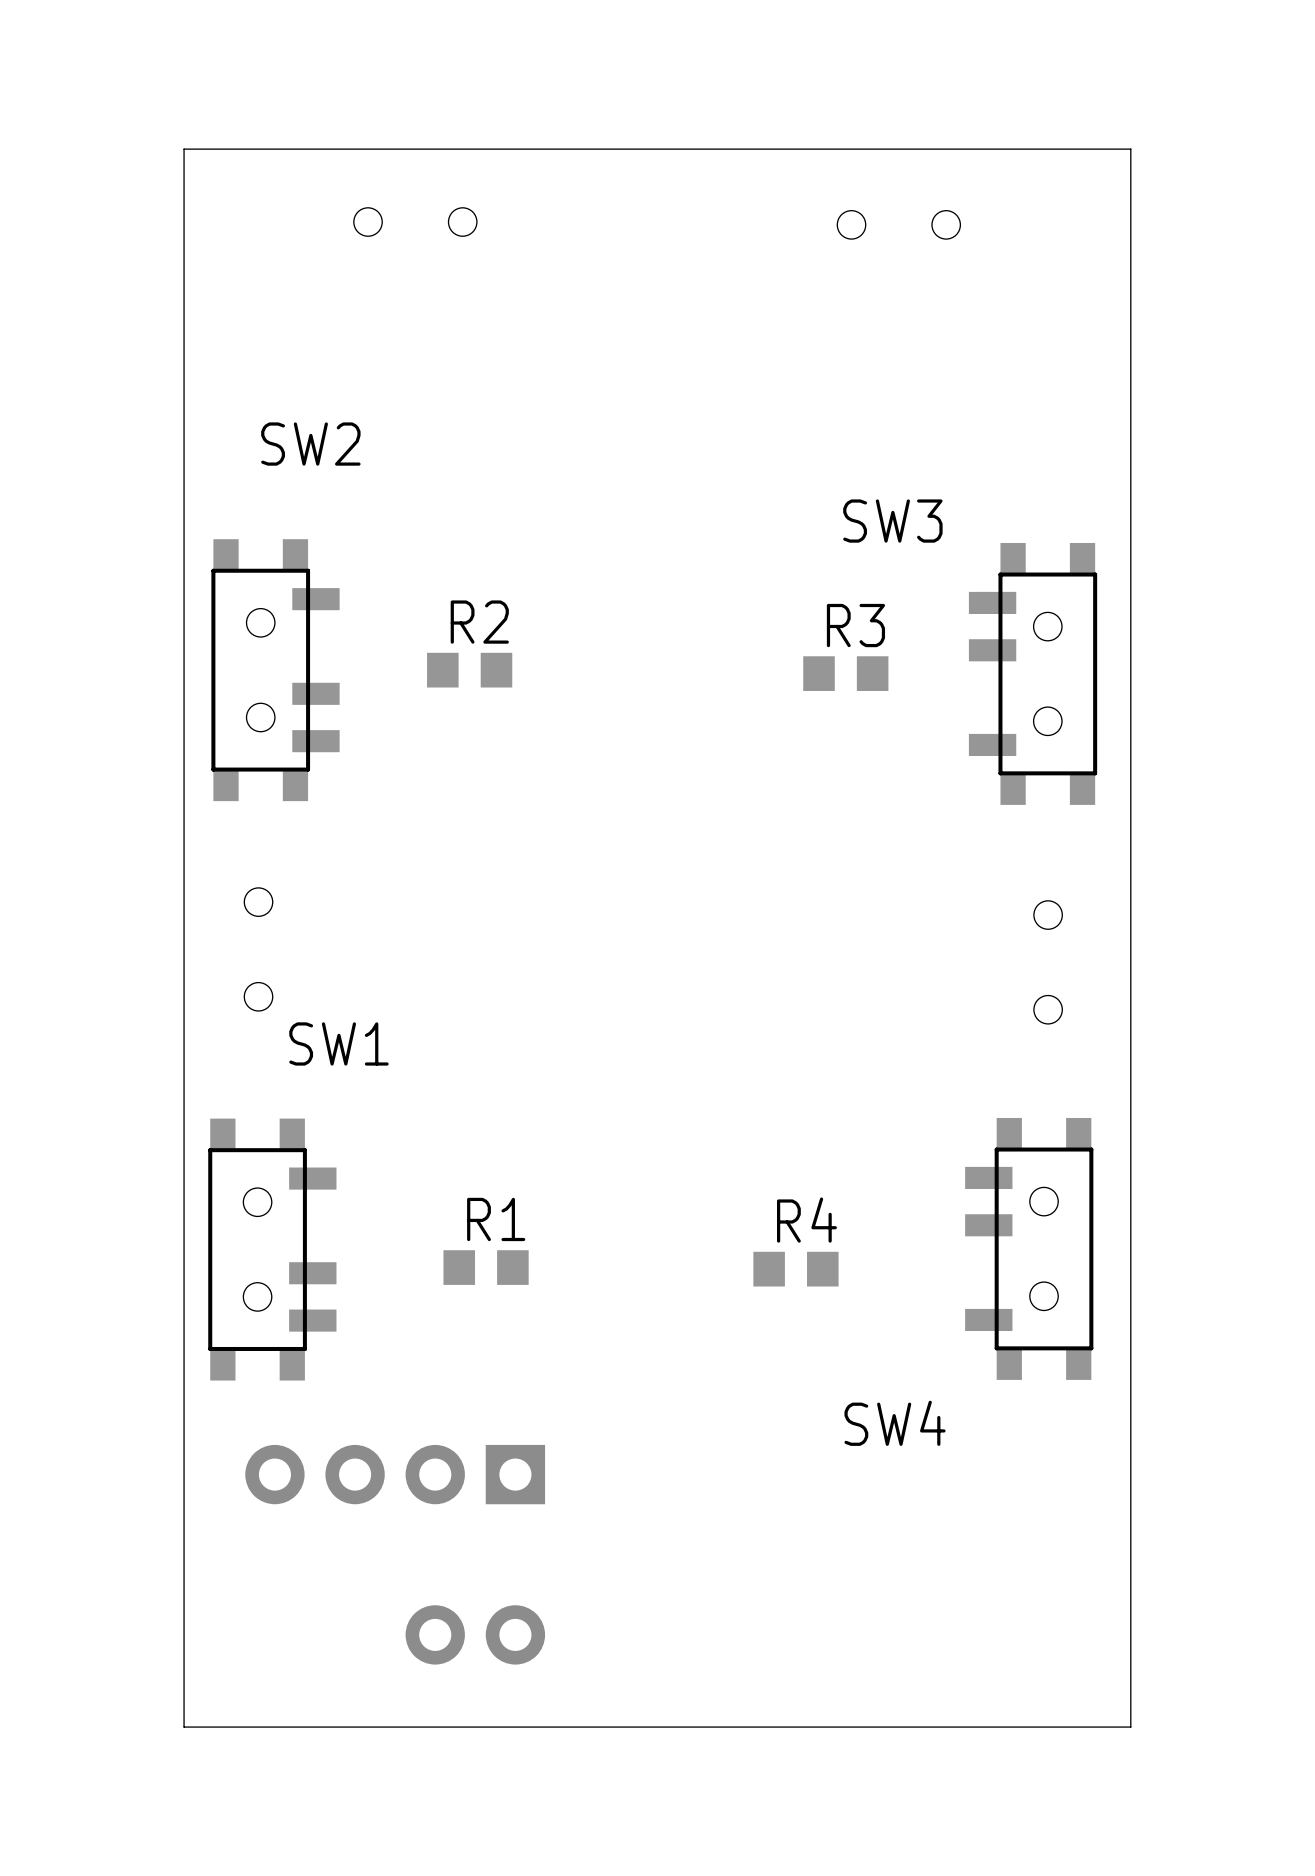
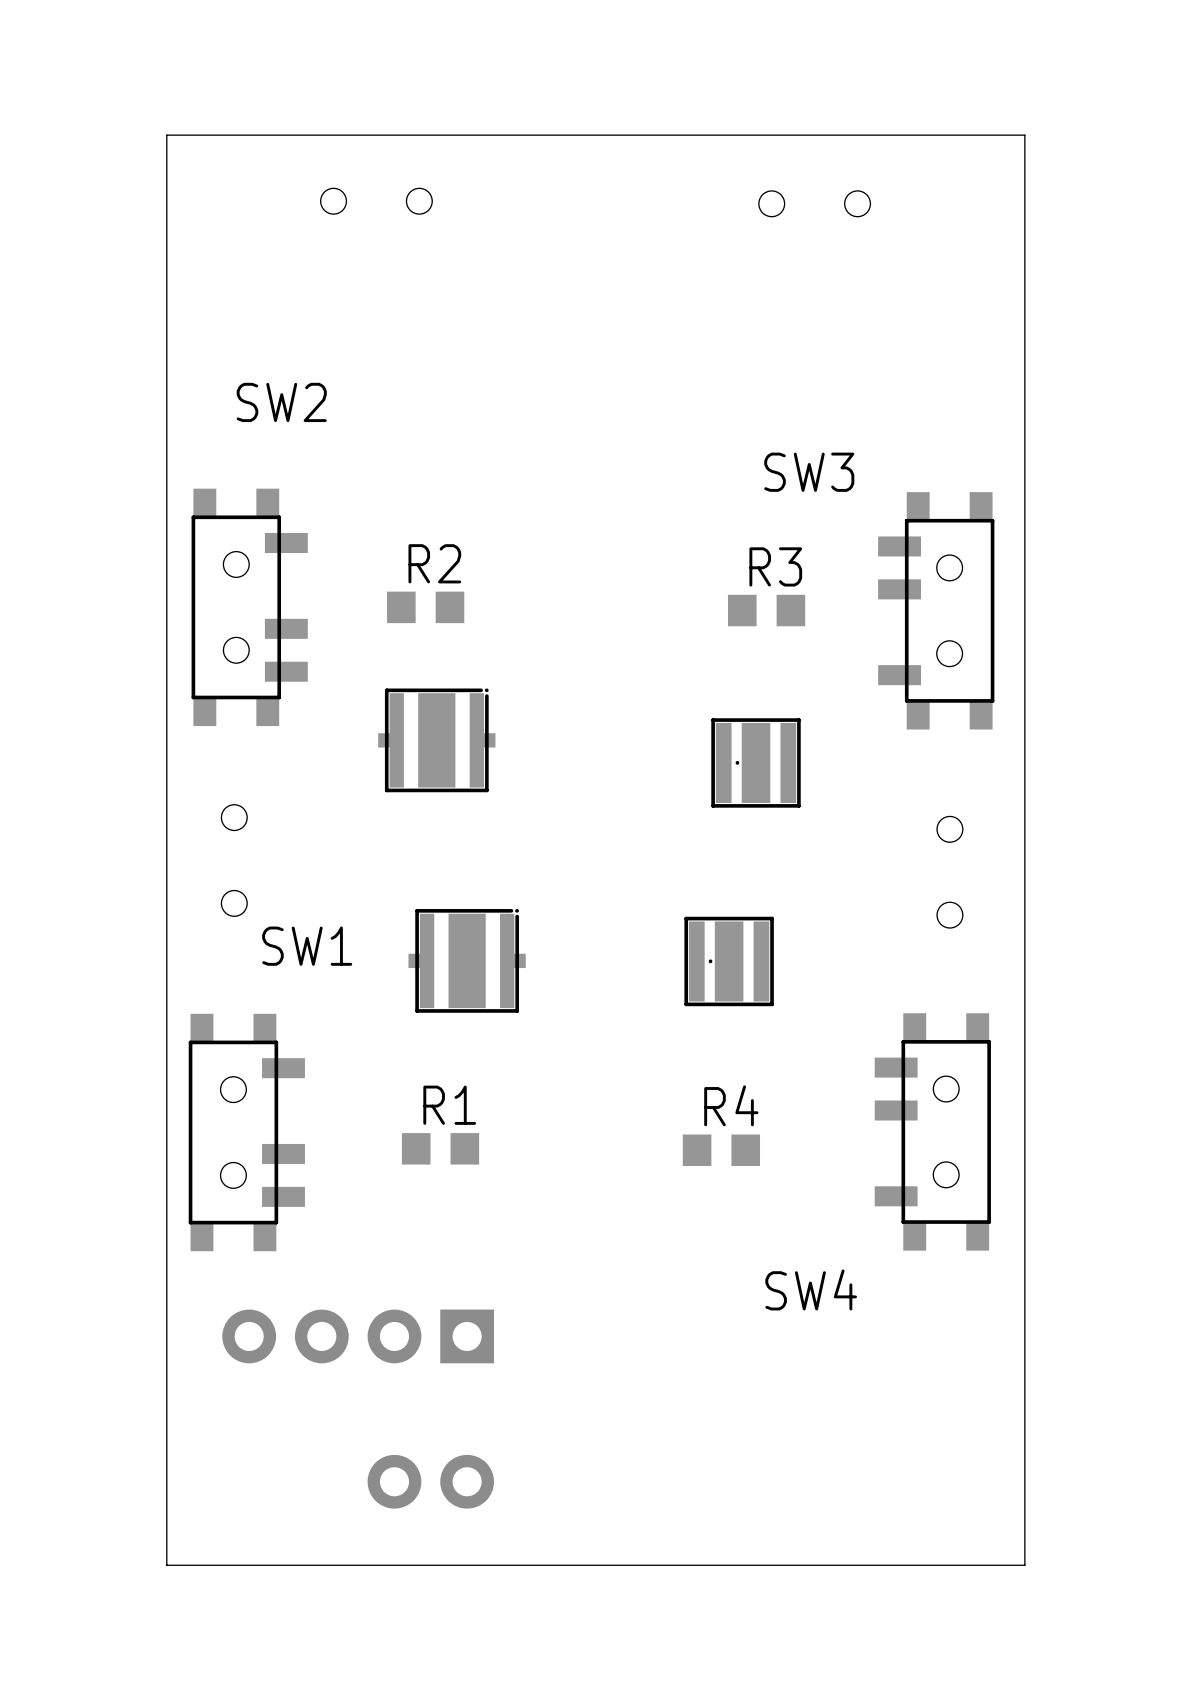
part: none -> (436, 740)
part: none -> (756, 762)
part: none -> (467, 960)
part: none -> (729, 961)

